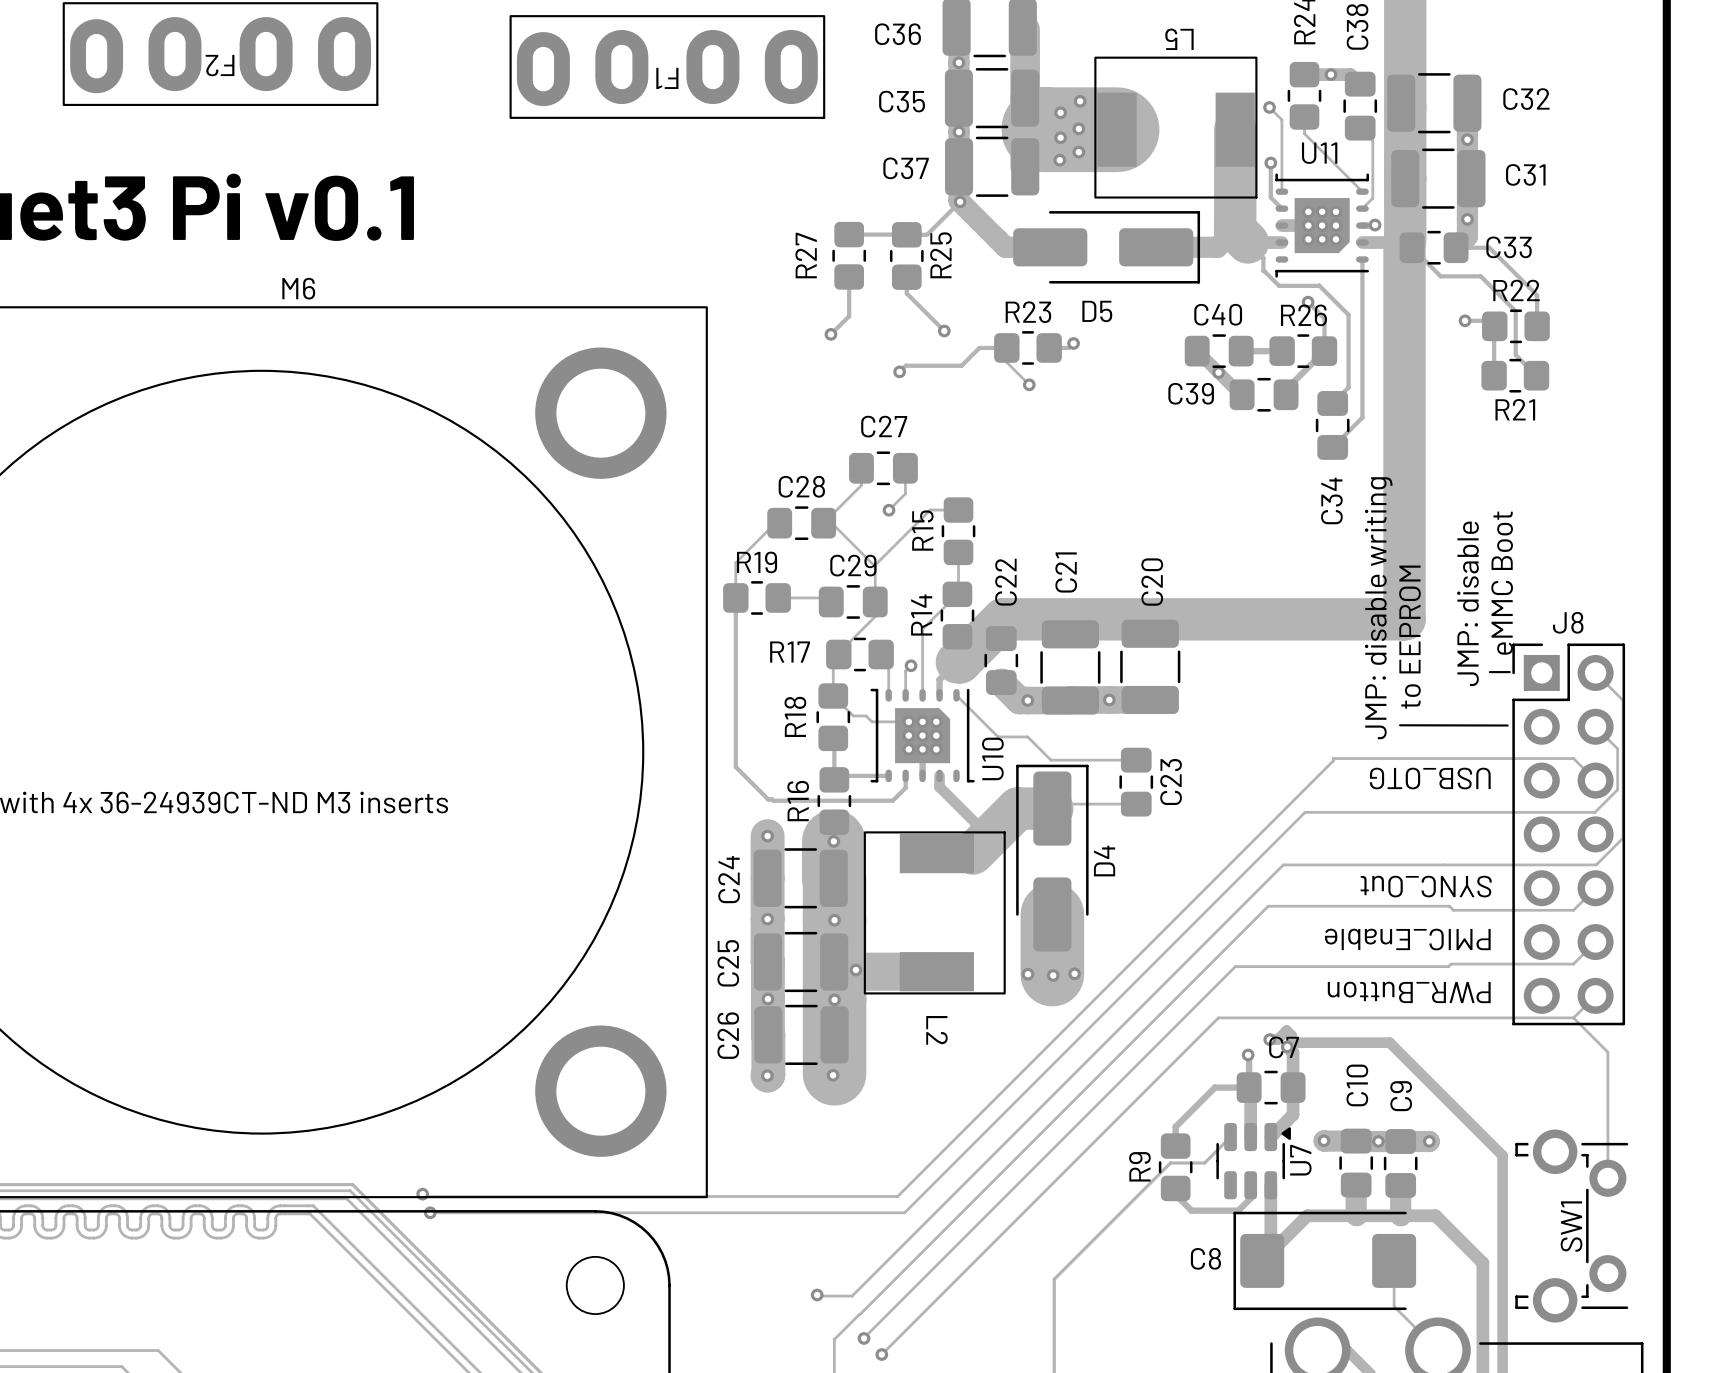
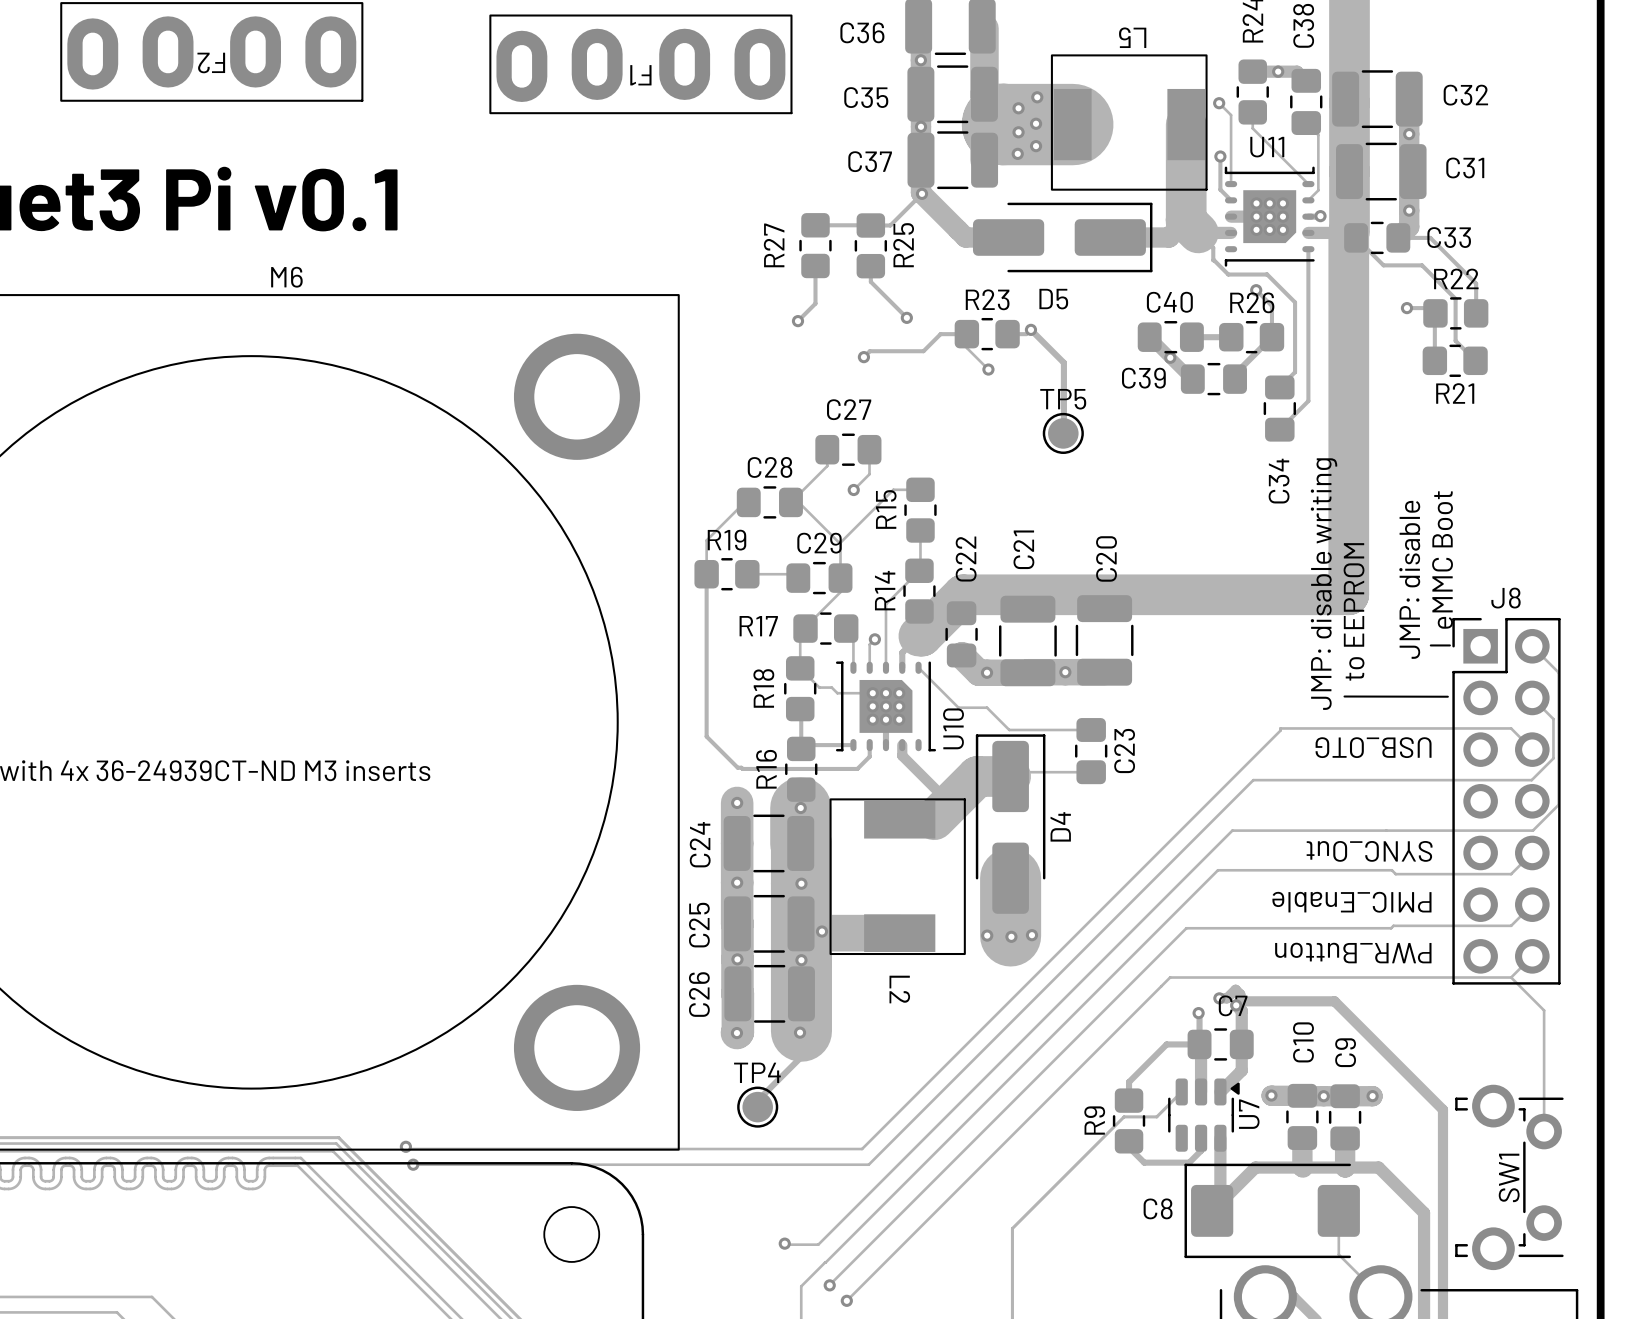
track: none -> (1030, 329) (1063, 362) (1063, 422)
TP5: none -> (1063, 433)
track: none -> (801, 1031) (801, 1056) (758, 1099)
TP4: none -> (757, 1107)

